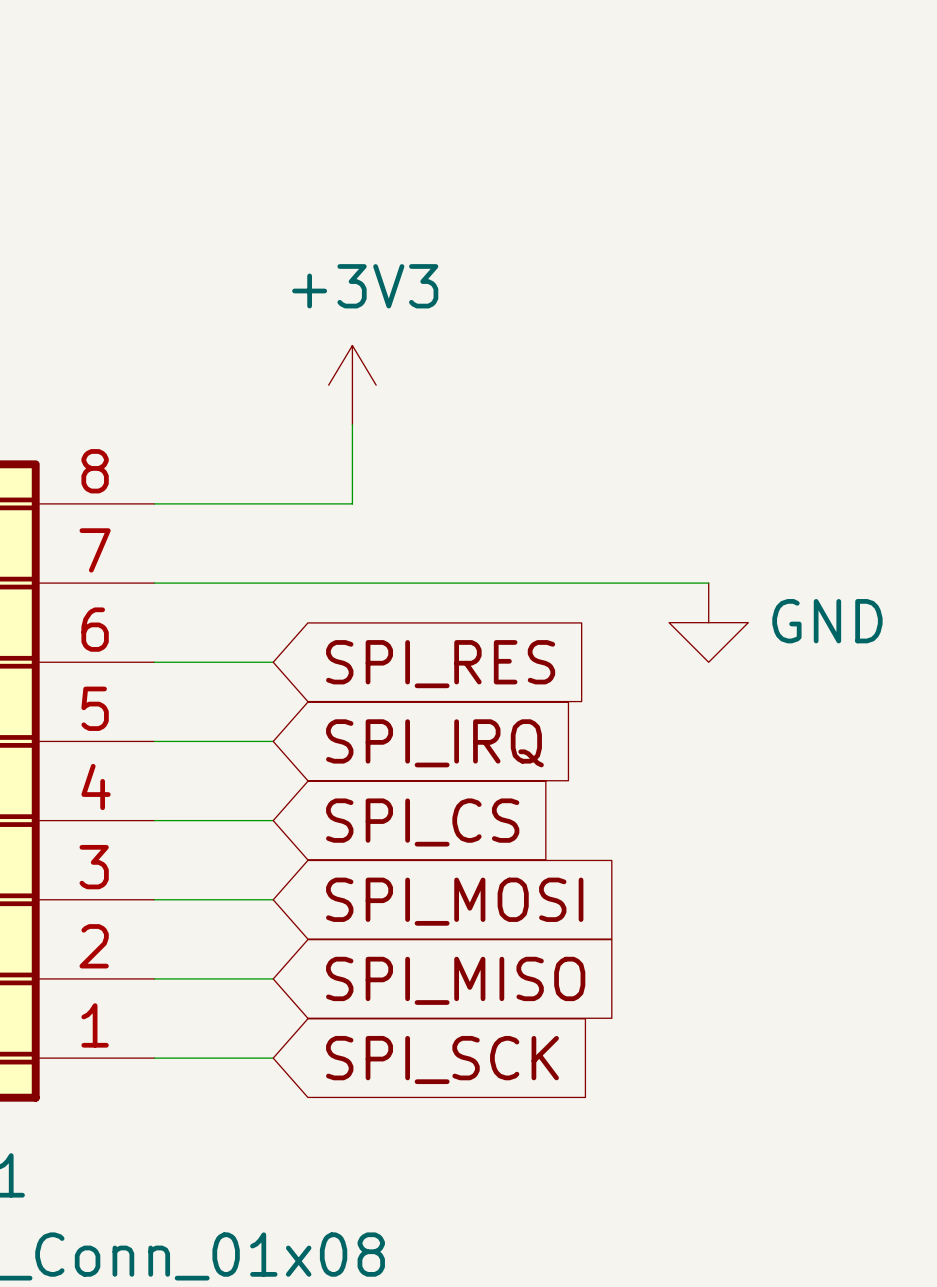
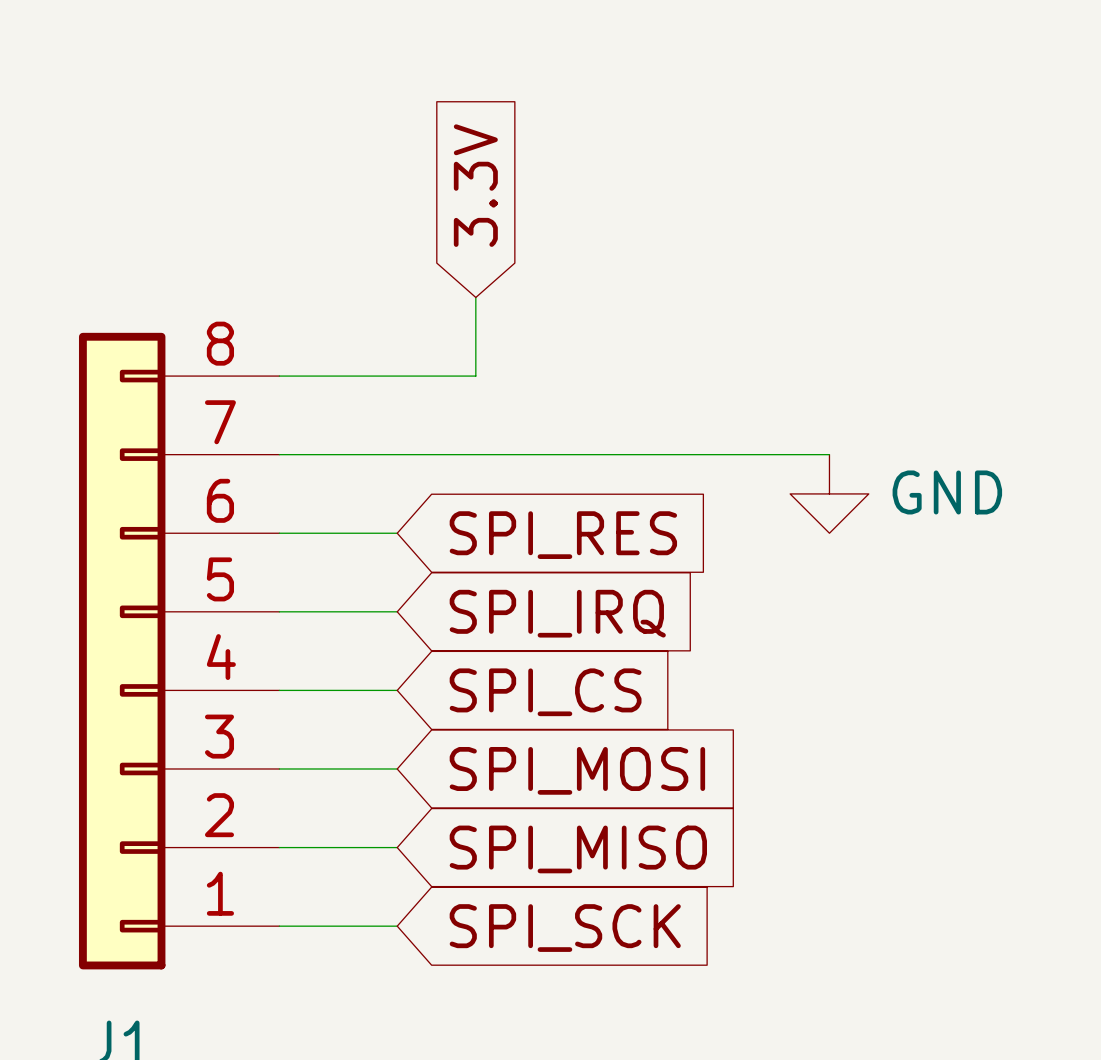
global label: none -> 3.3V (475, 185)
power symbol: +3V3 (352, 385) -> none

